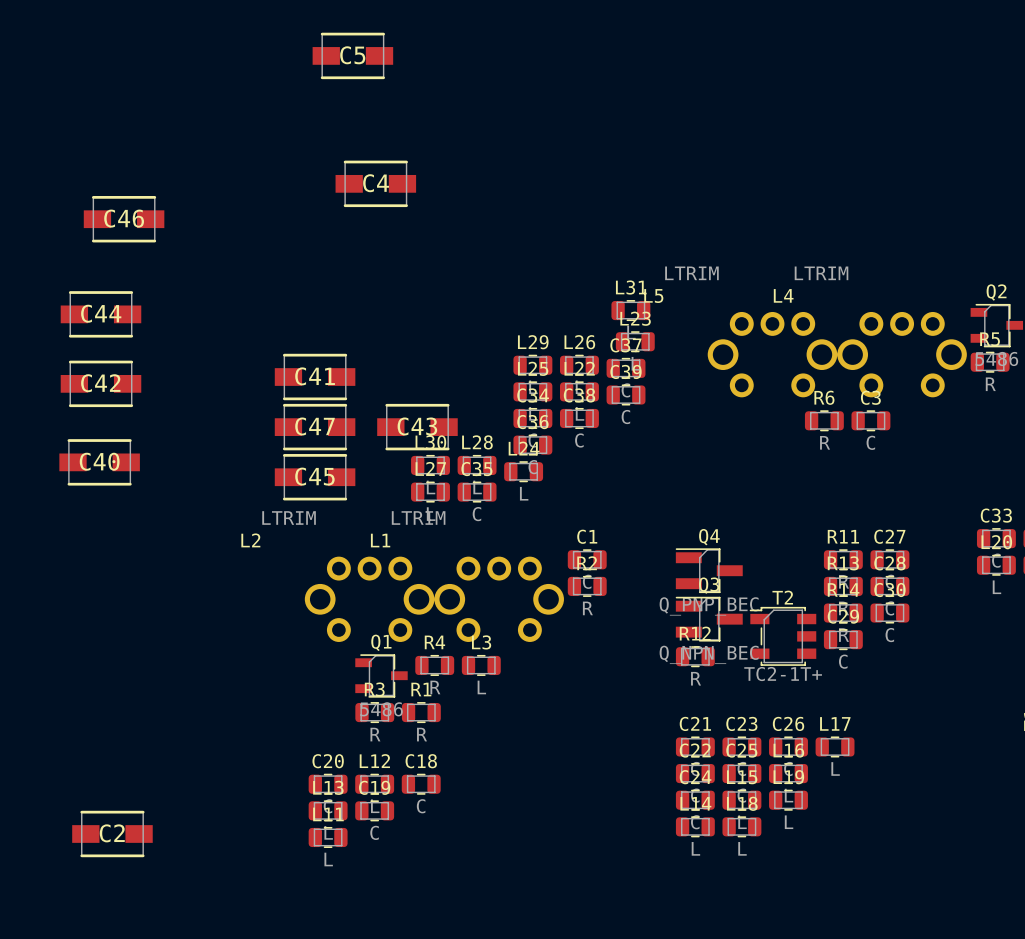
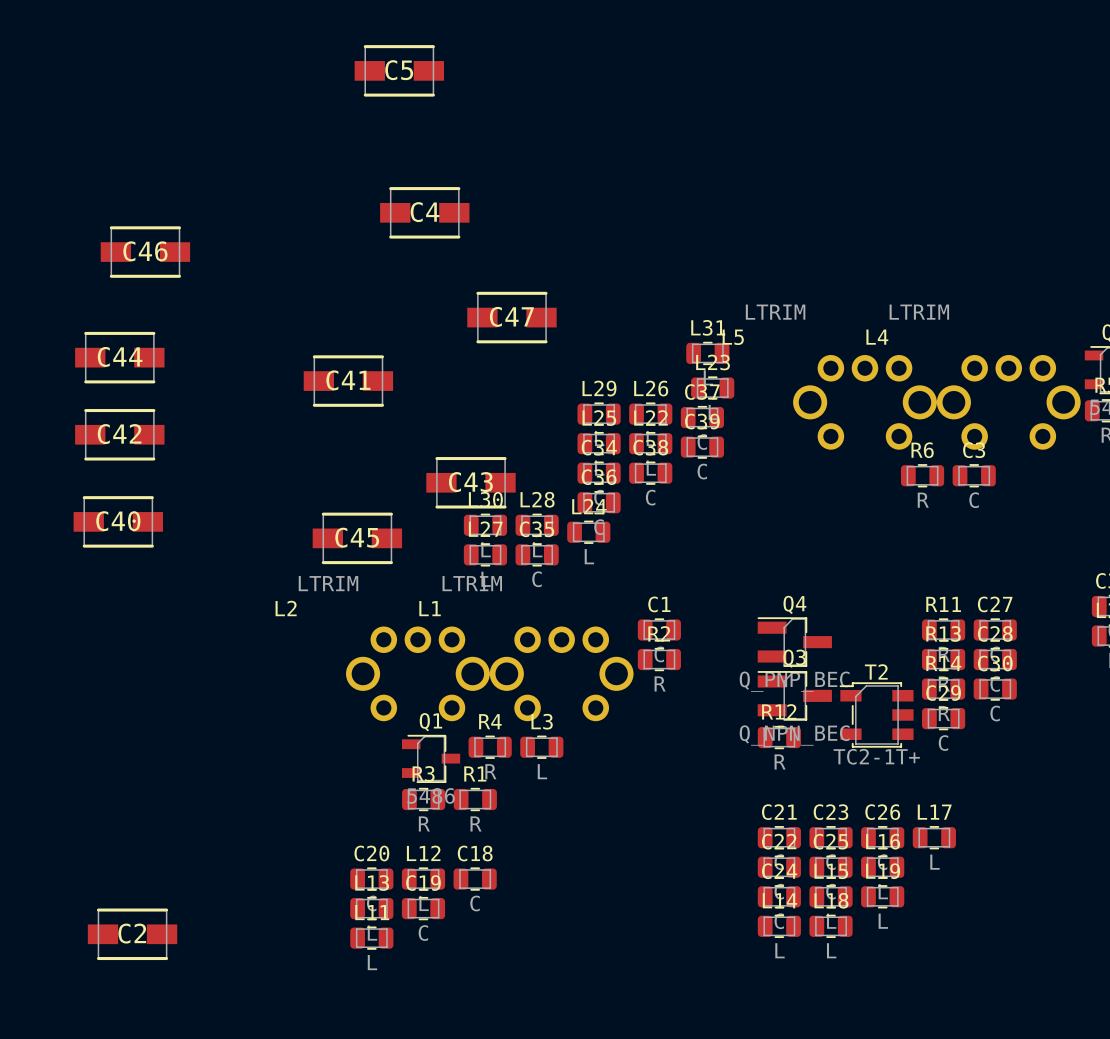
C41 position: (315, 377) -> (348, 381)
C47 position: (315, 427) -> (511, 317)

